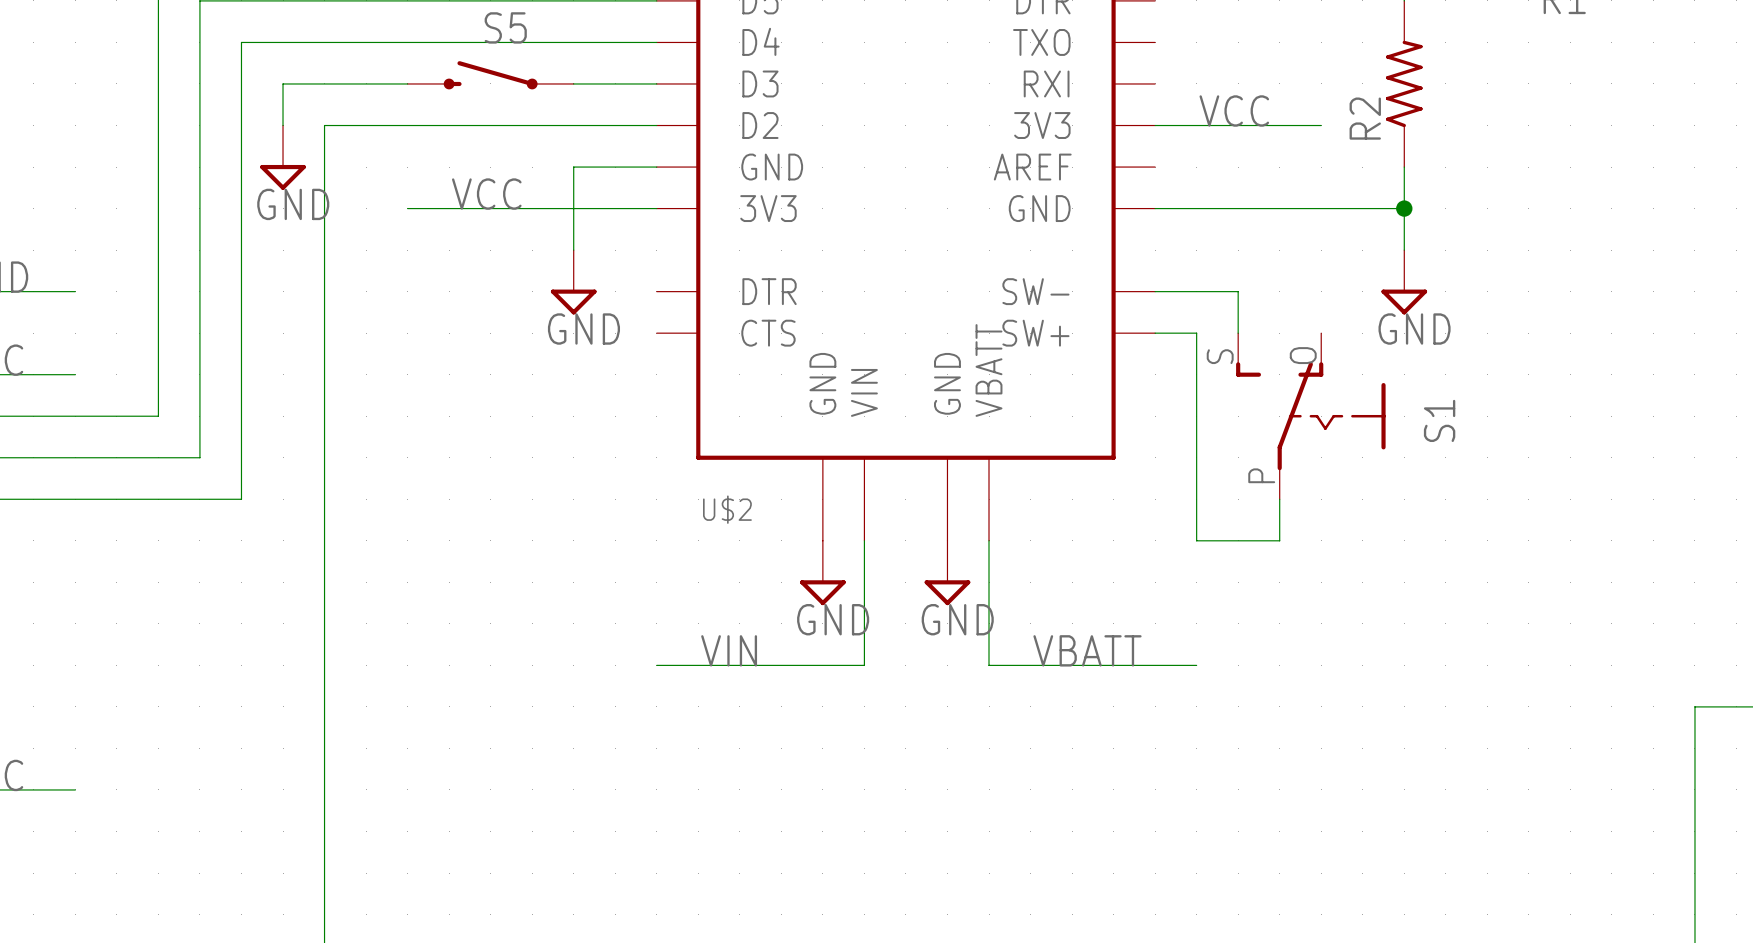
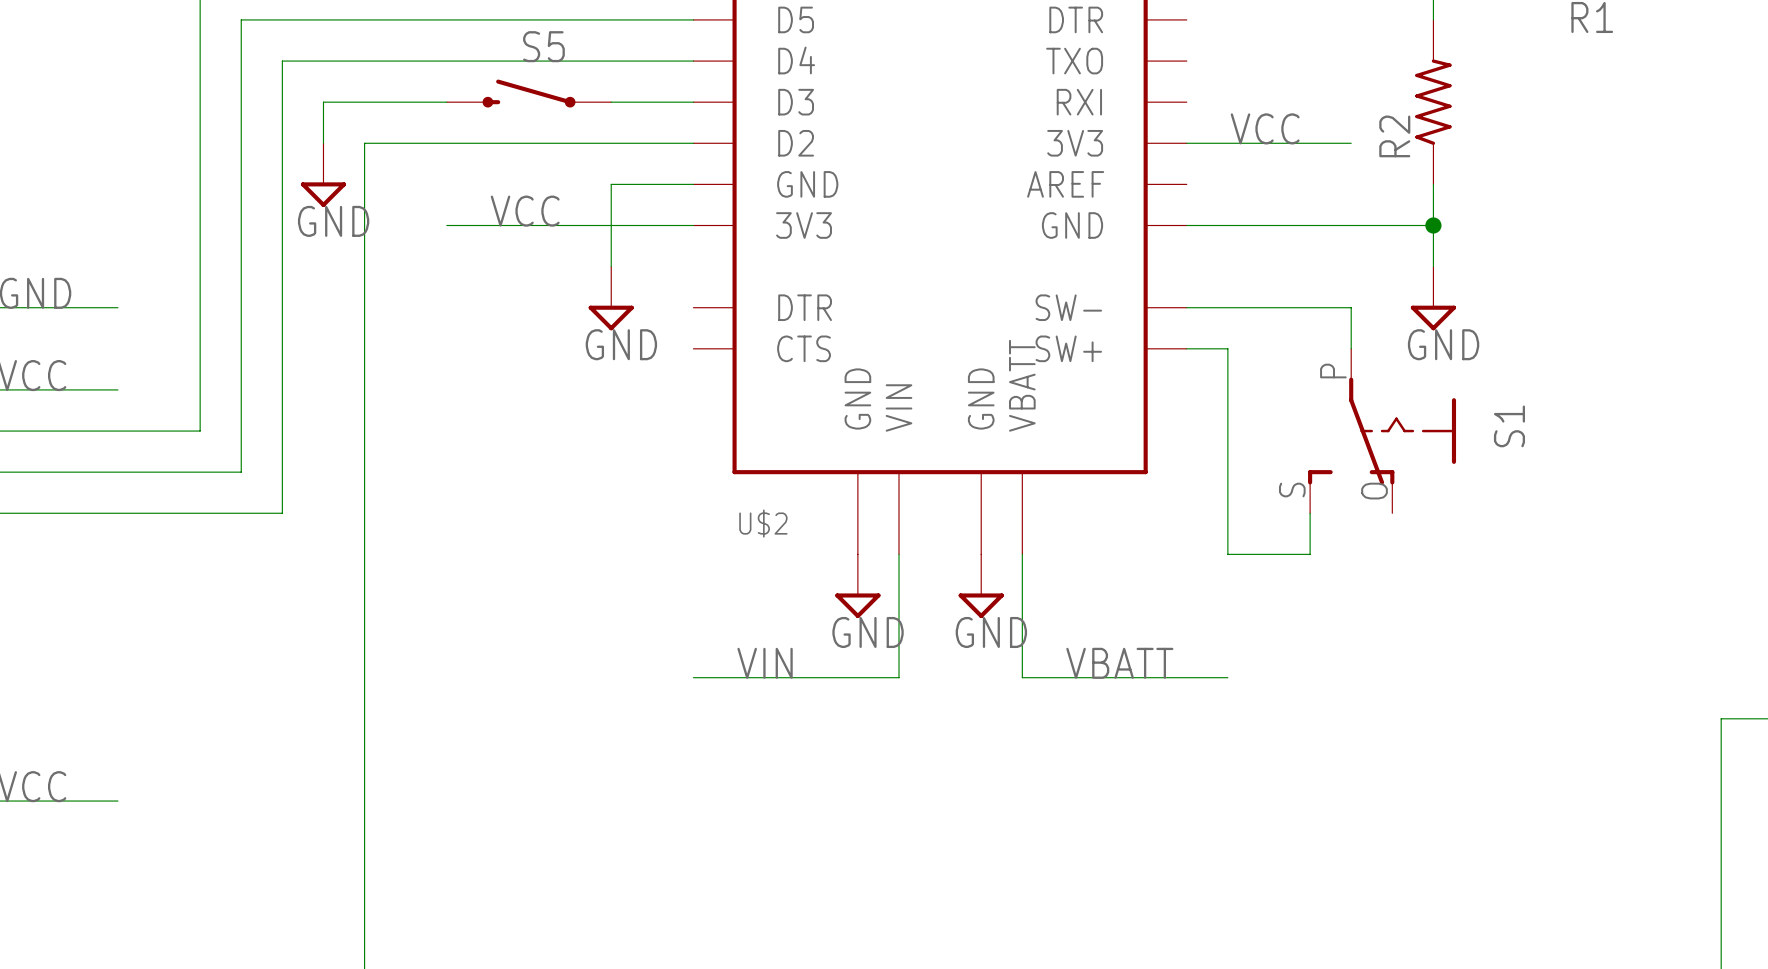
wire: (1238, 291) (1238, 333) -> (1268, 307) (1351, 307) (1351, 348)
S1 flip: as is (1310, 416) -> up-down (1382, 431)

